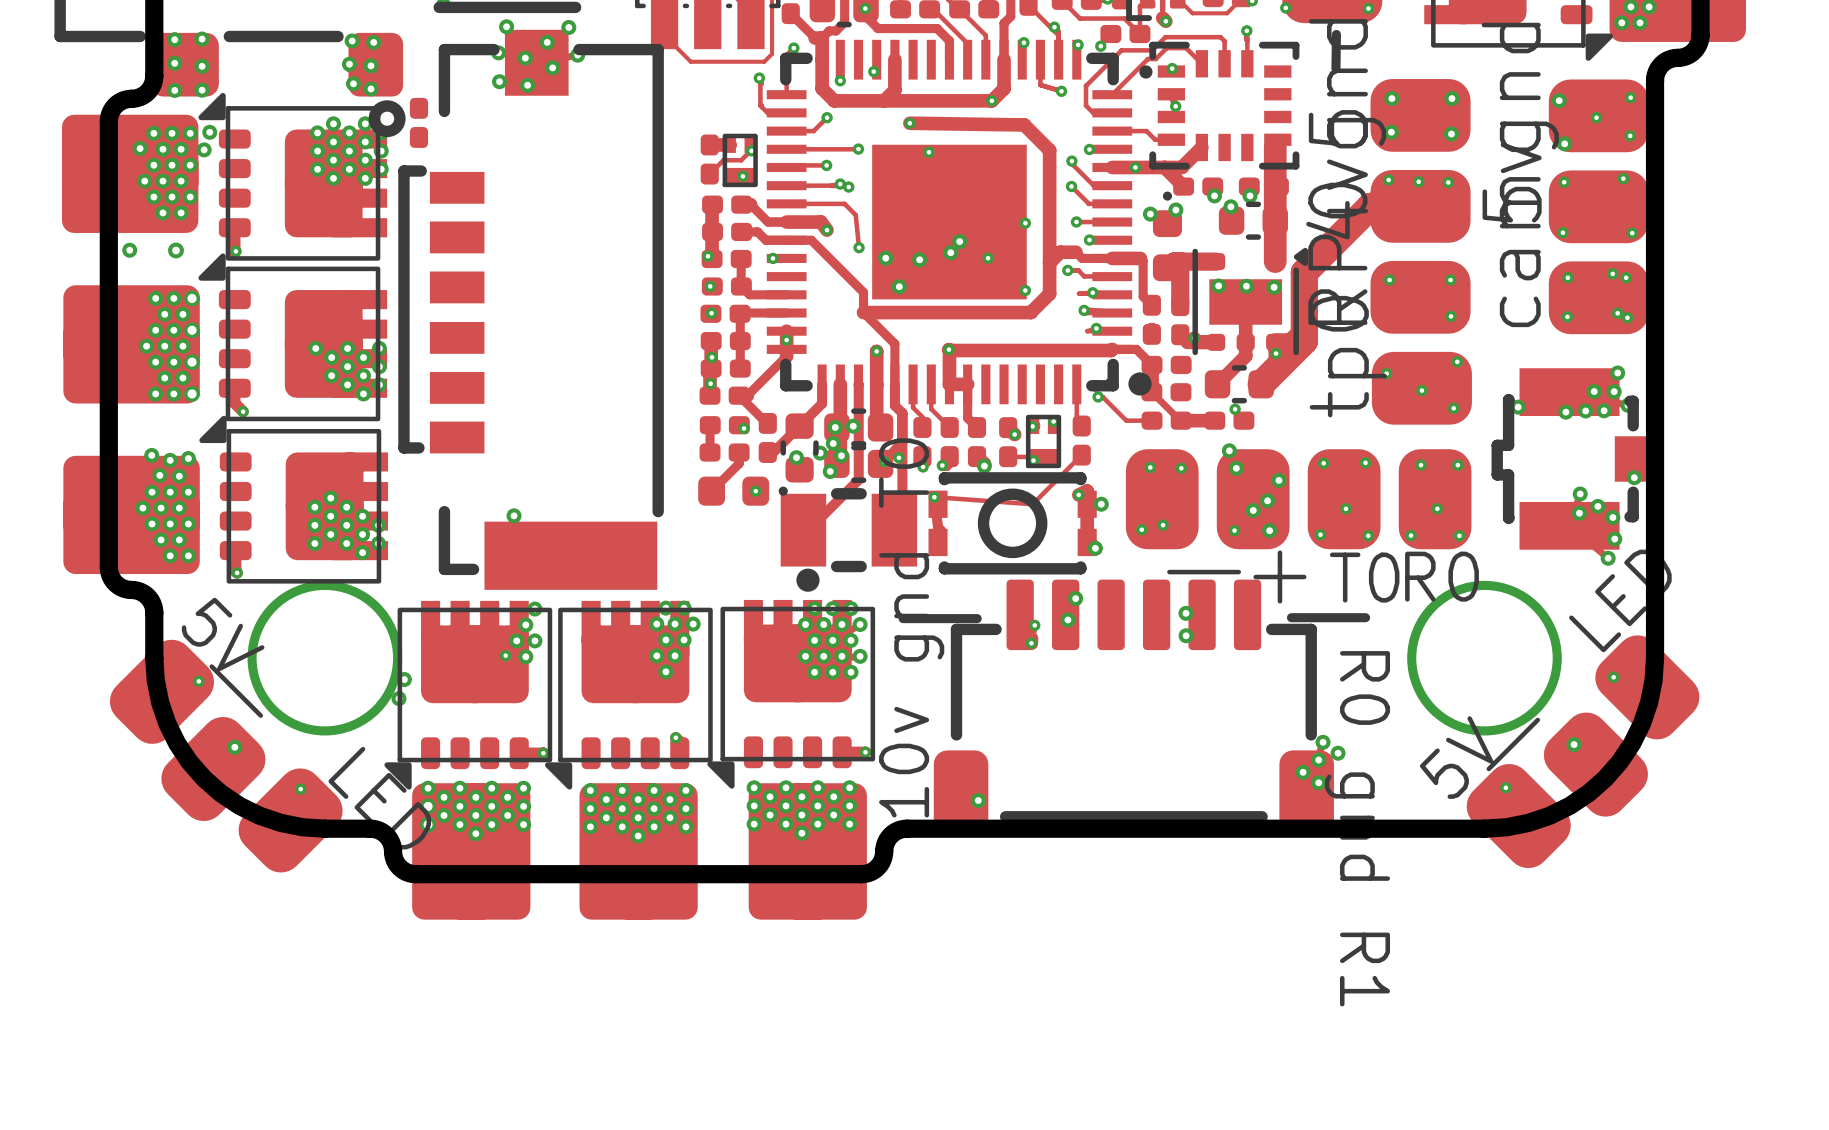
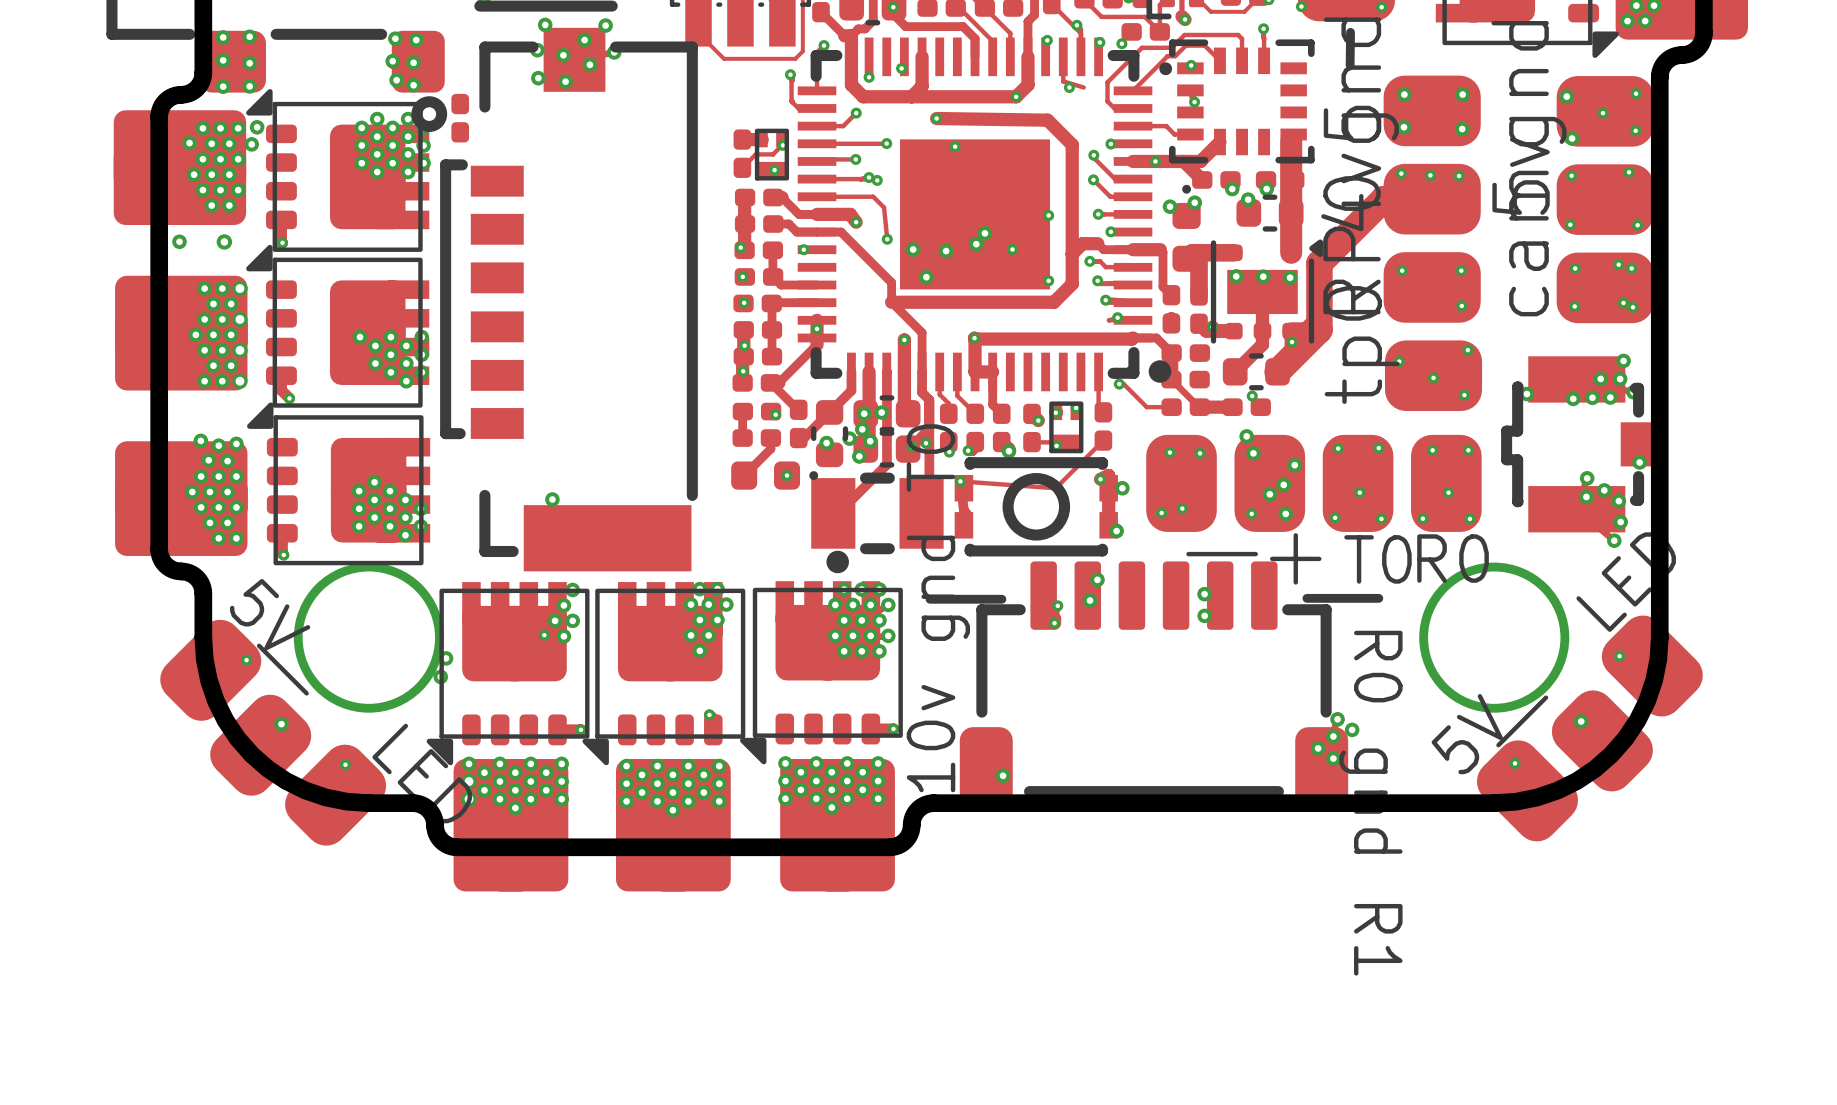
via position: (1061, 91) -> (1069, 87)
via position: (1092, 292) -> (1097, 280)

